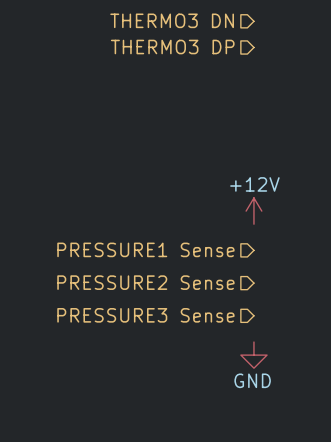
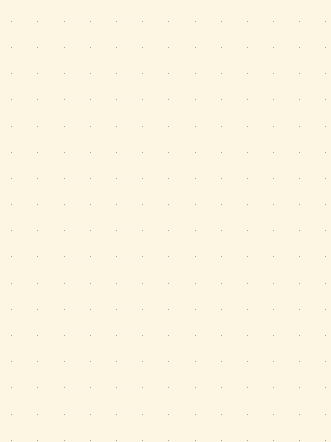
hierarchical label: THERMO3 DN (172, 20) -> none
hierarchical label: THERMO3 DP (172, 47) -> none
power symbol: +12V (253, 211) -> none
hierarchical label: PRESSURE1 Sense (145, 249) -> none
hierarchical label: PRESSURE2 Sense (145, 282) -> none
hierarchical label: PRESSURE3 Sense (145, 315) -> none
power symbol: GND (253, 355) -> none

